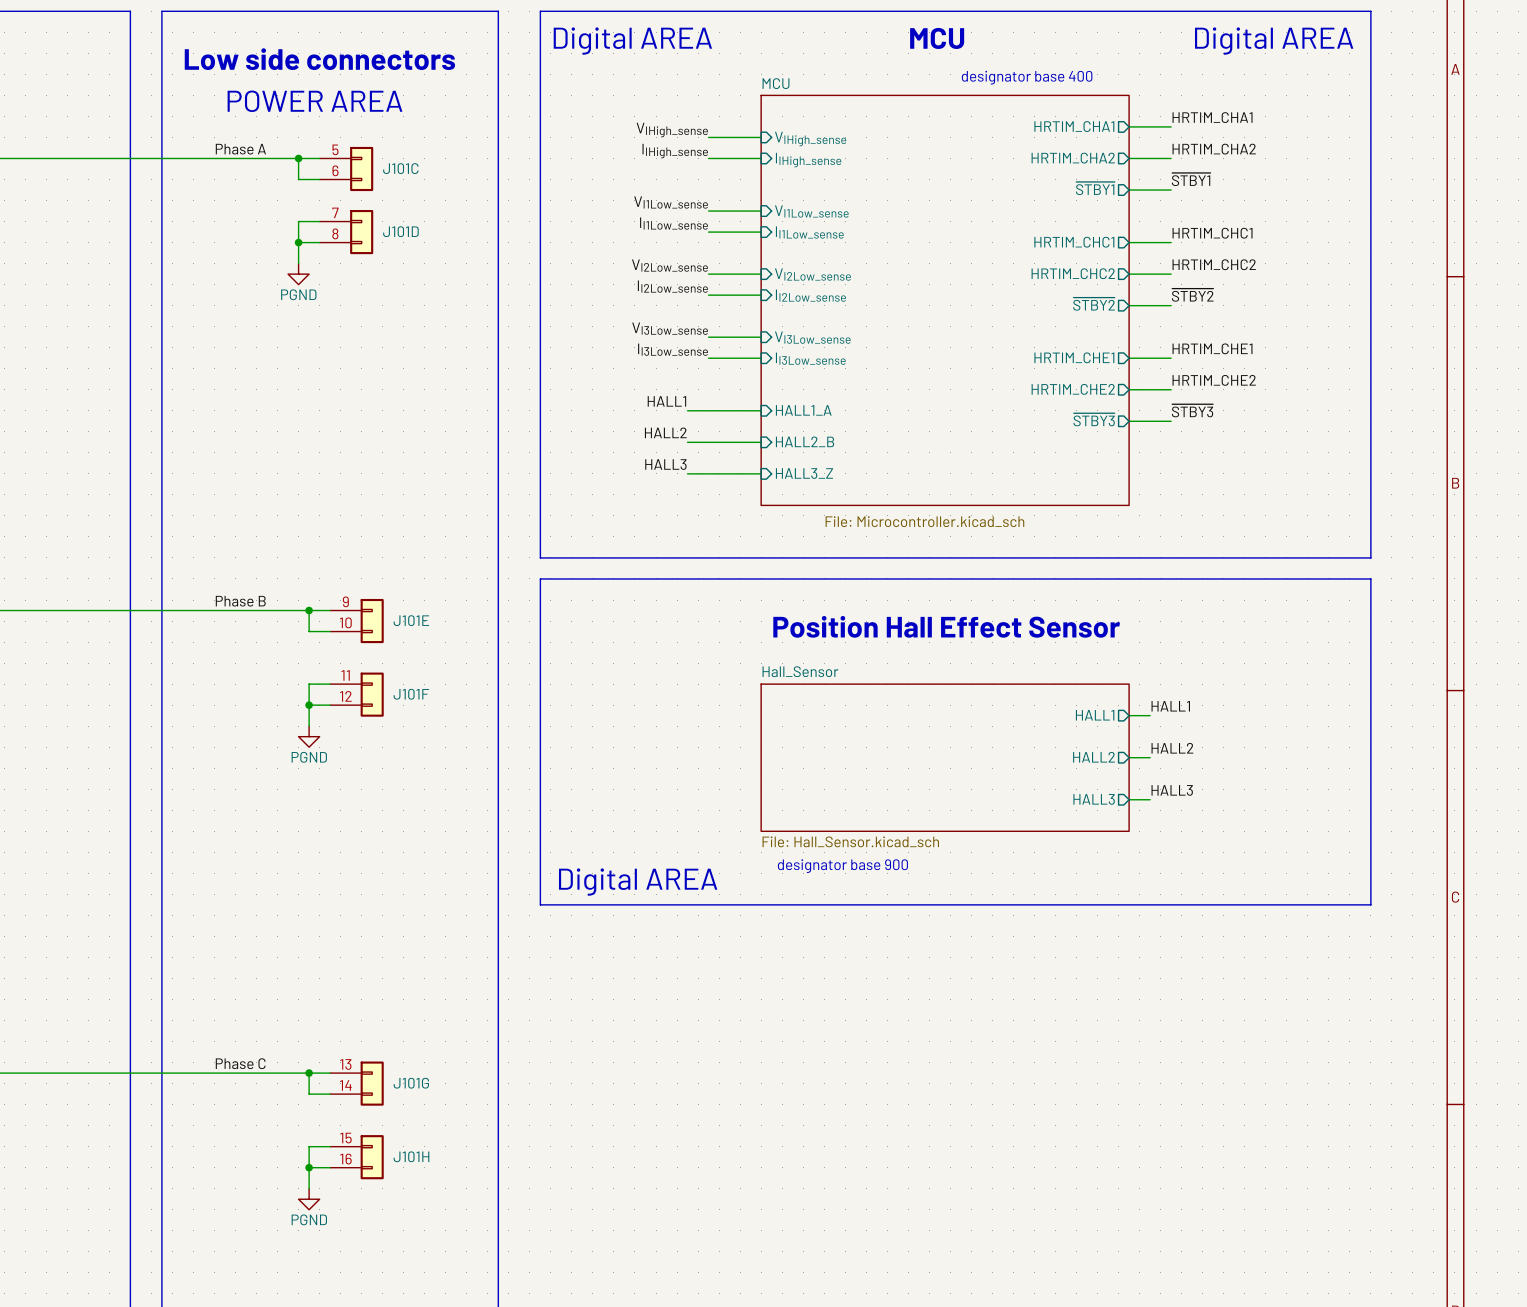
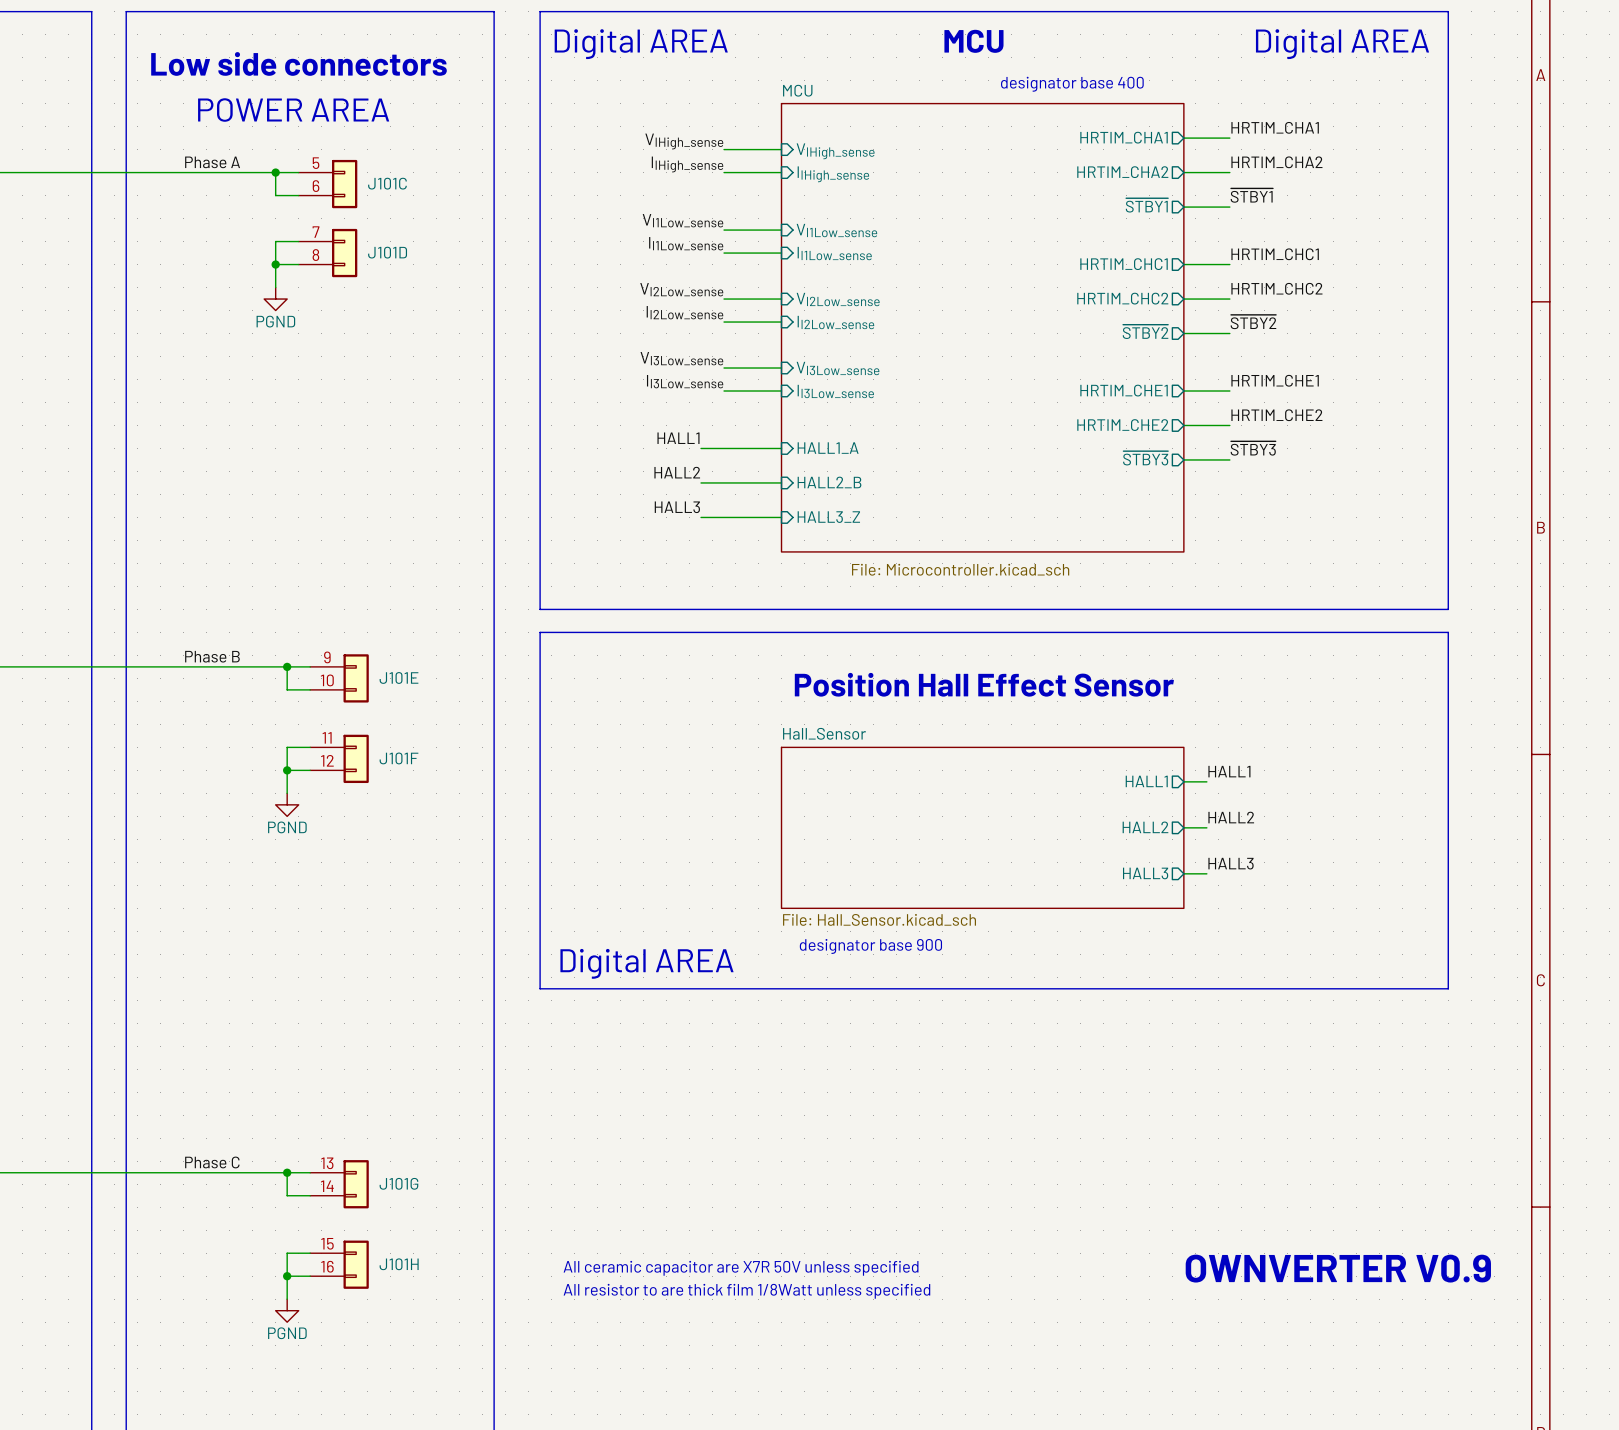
text: none -> All ceramic capacitor are X7R 50V unless specified (741, 1268)
text: none -> OWNVERTER V0.9 (1338, 1268)
text: none -> All resistor to are thick film 1/8Watt unless specified (746, 1291)

